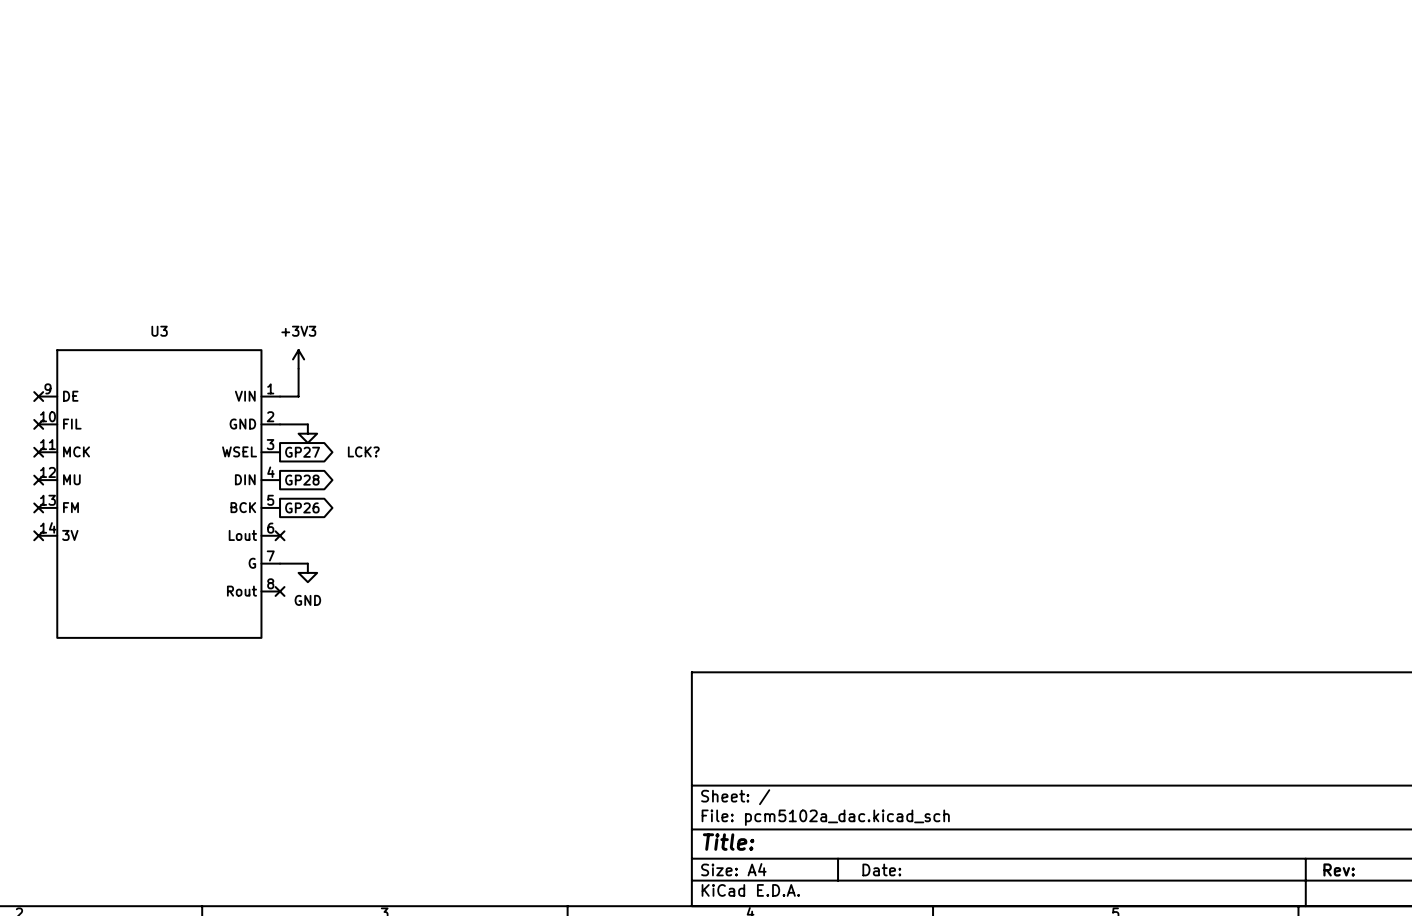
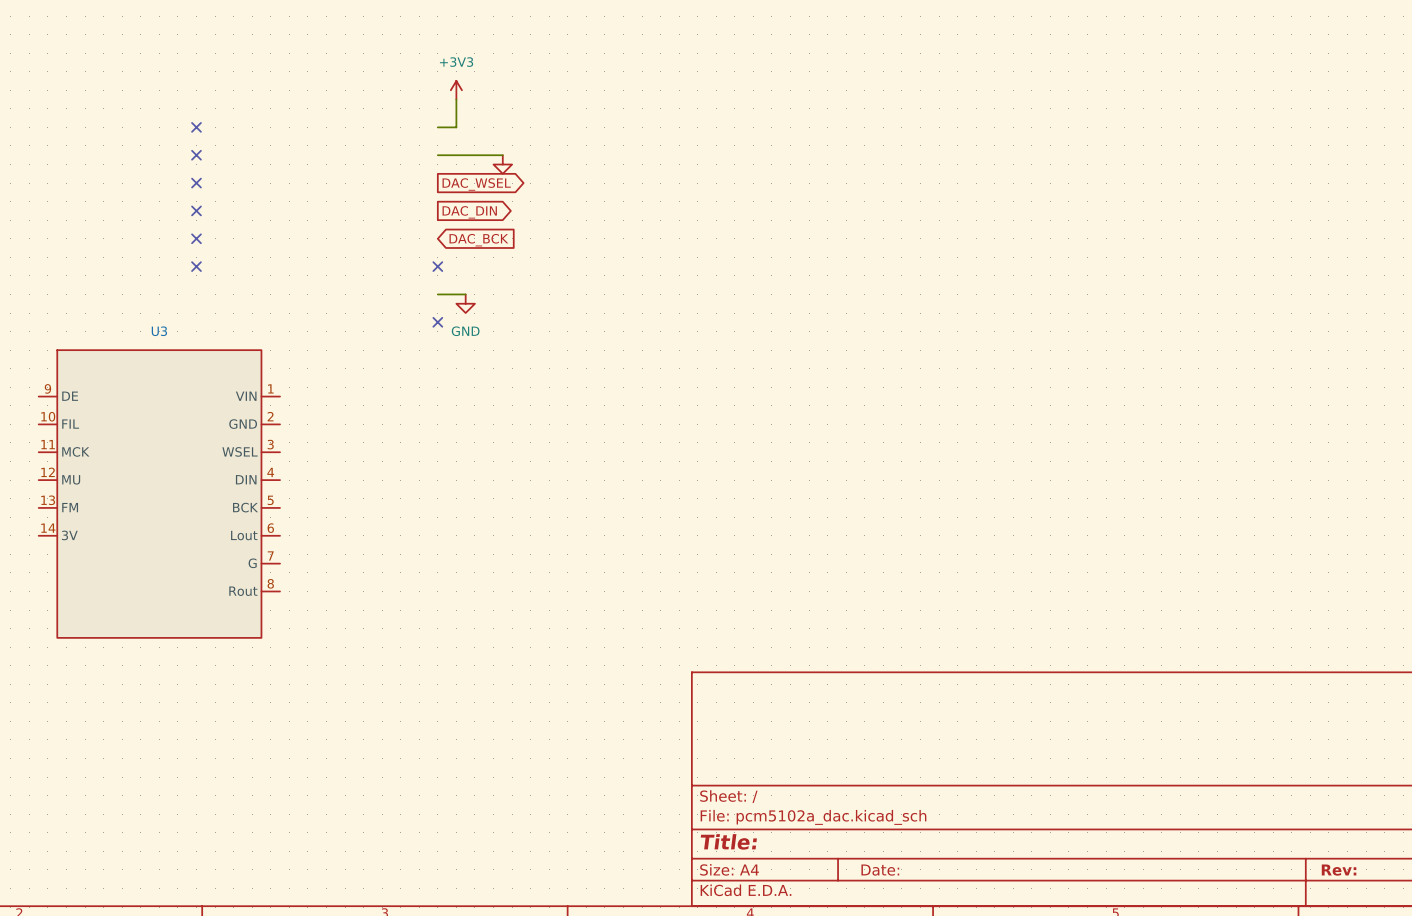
power symbol: none -> +3V3 (456, 90)
wire: none -> (456, 99) (456, 127) (437, 127)
no-connect mark: none -> (196, 127)
no-connect mark: none -> (196, 155)
wire: none -> (437, 155) (502, 155)
power symbol: none -> (502, 164)
no-connect mark: none -> (196, 183)
global label: none -> DAC_WSEL (476, 184)
no-connect mark: none -> (196, 210)
global label: none -> DAC_DIN (469, 212)
no-connect mark: none -> (196, 238)
global label: none -> DAC_BCK (478, 240)
no-connect mark: none -> (196, 266)
no-connect mark: none -> (437, 266)
wire: none -> (437, 294) (465, 294)
power symbol: none -> GND (465, 303)
no-connect mark: none -> (437, 322)
power symbol: +3V3 (298, 359) -> none
wire: (298, 368) (298, 396) (280, 396) -> none
no-connect mark: (38, 396) -> none
no-connect mark: (38, 424) -> none
wire: (280, 424) (307, 424) -> none
power symbol: (307, 433) -> none
text: LCK? (363, 451) -> none
no-connect mark: (38, 452) -> none
global label: GP27 (302, 452) -> none
no-connect mark: (38, 480) -> none
global label: GP28 (302, 480) -> none
no-connect mark: (38, 507) -> none
global label: GP26 (302, 507) -> none
no-connect mark: (38, 535) -> none
no-connect mark: (280, 535) -> none
wire: (280, 563) (307, 563) -> none
power symbol: GND (307, 572) -> none
no-connect mark: (280, 591) -> none

